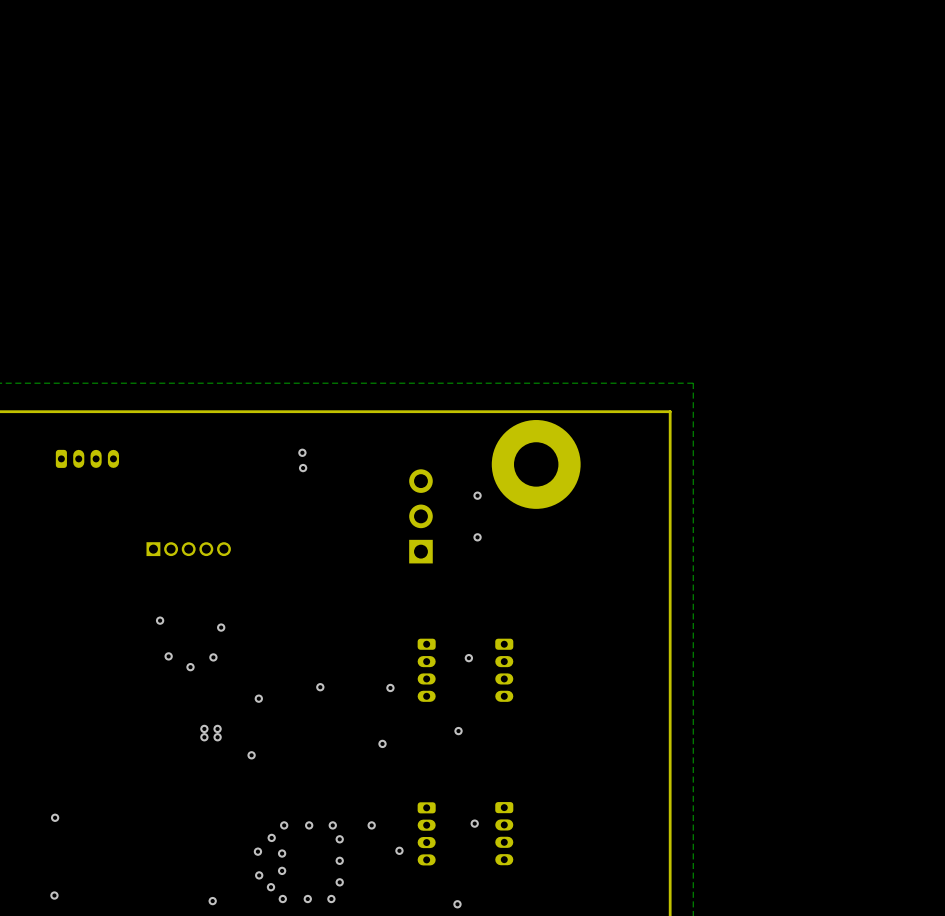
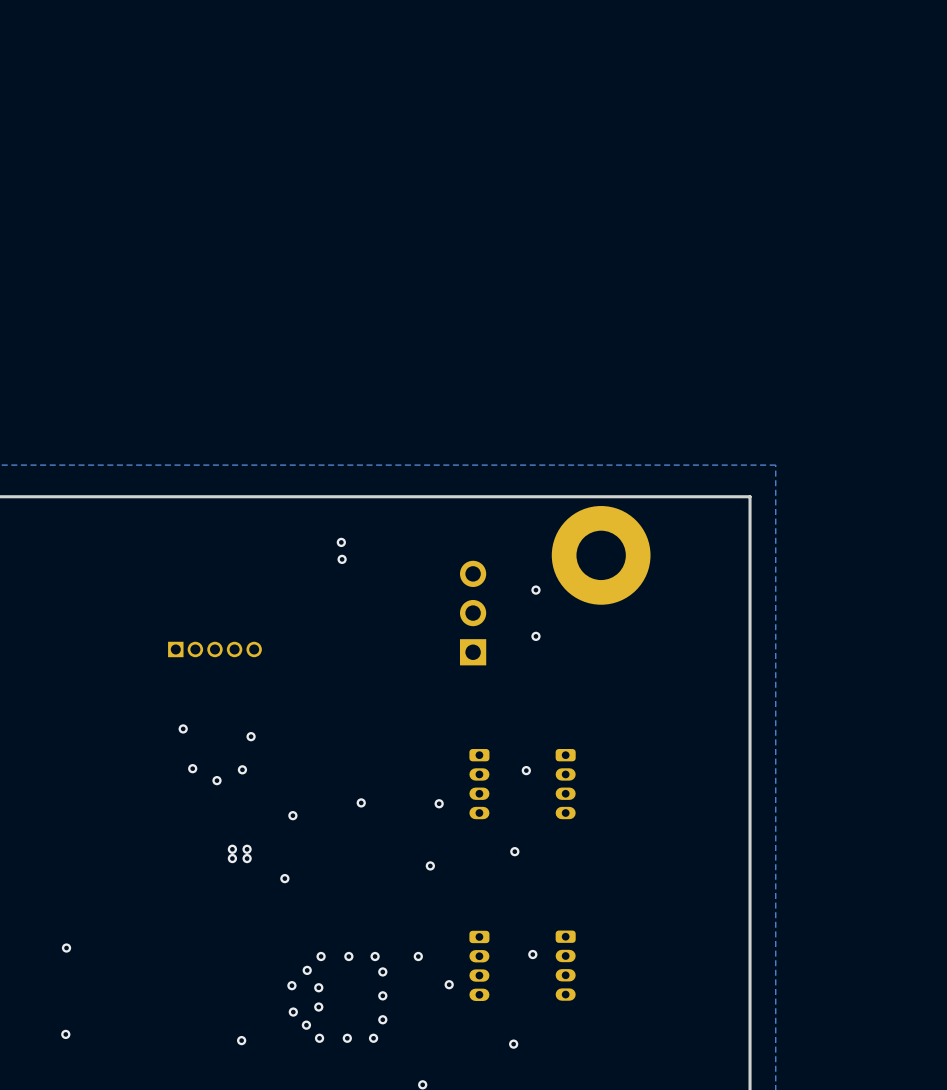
part: (87, 458) -> none

